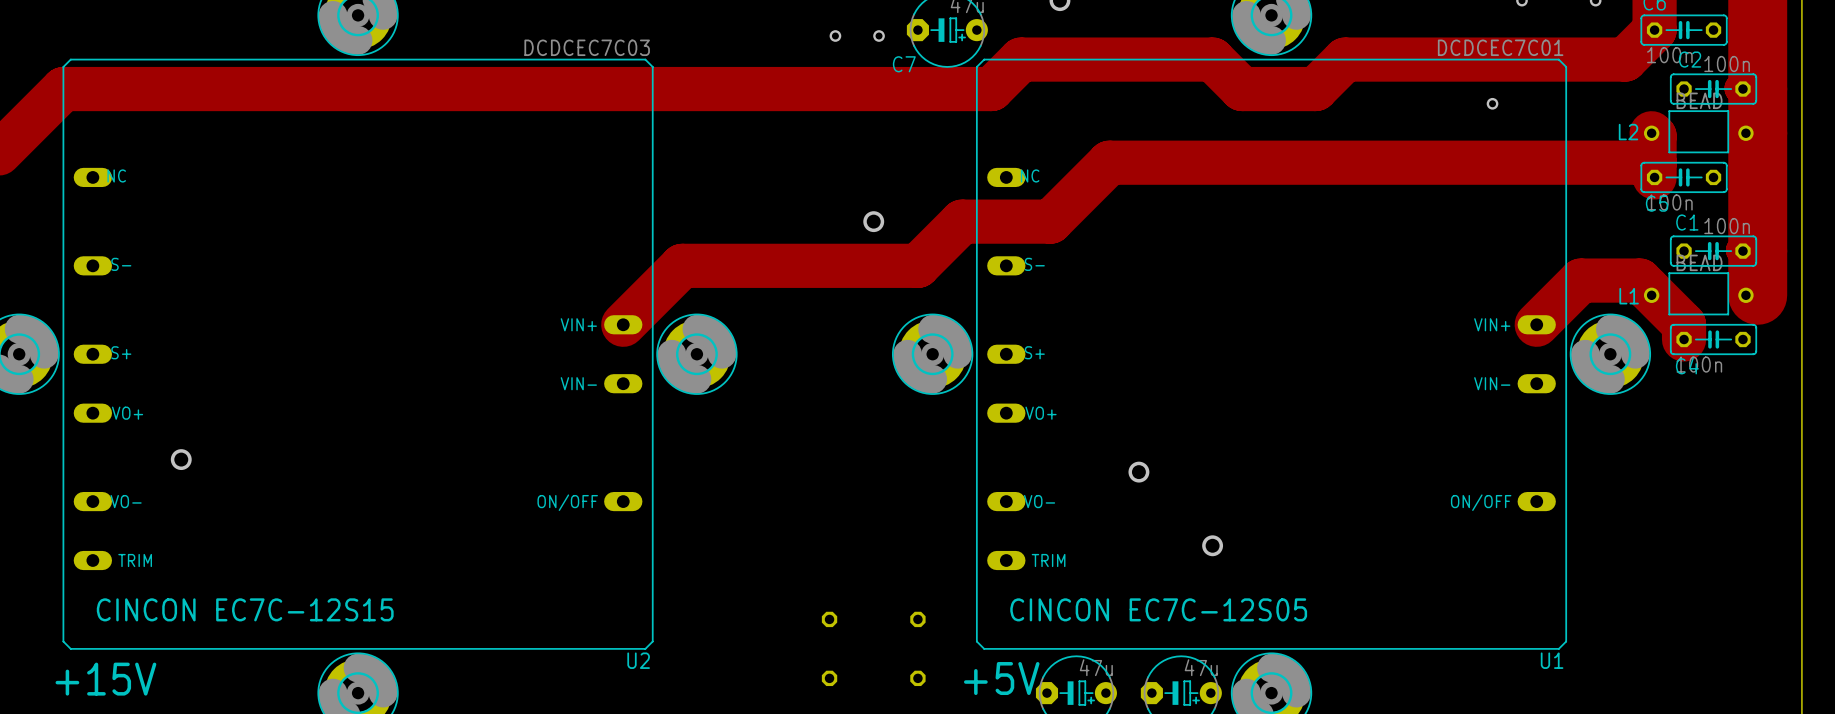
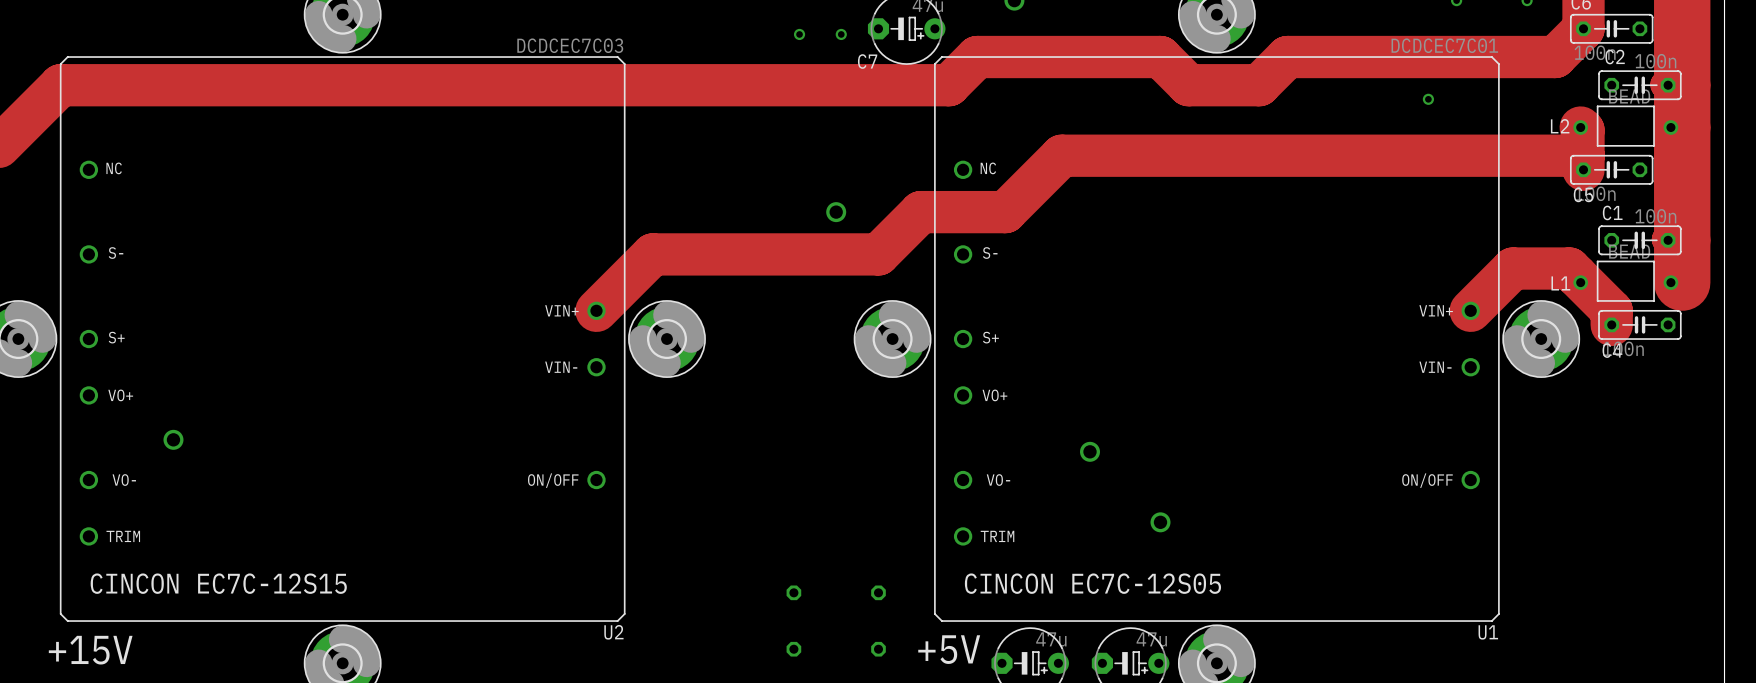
U2 footprint: [62, 58, 654, 650] -> [59, 56, 626, 622]
U1 footprint: [975, 58, 1568, 650] -> [934, 56, 1500, 622]

